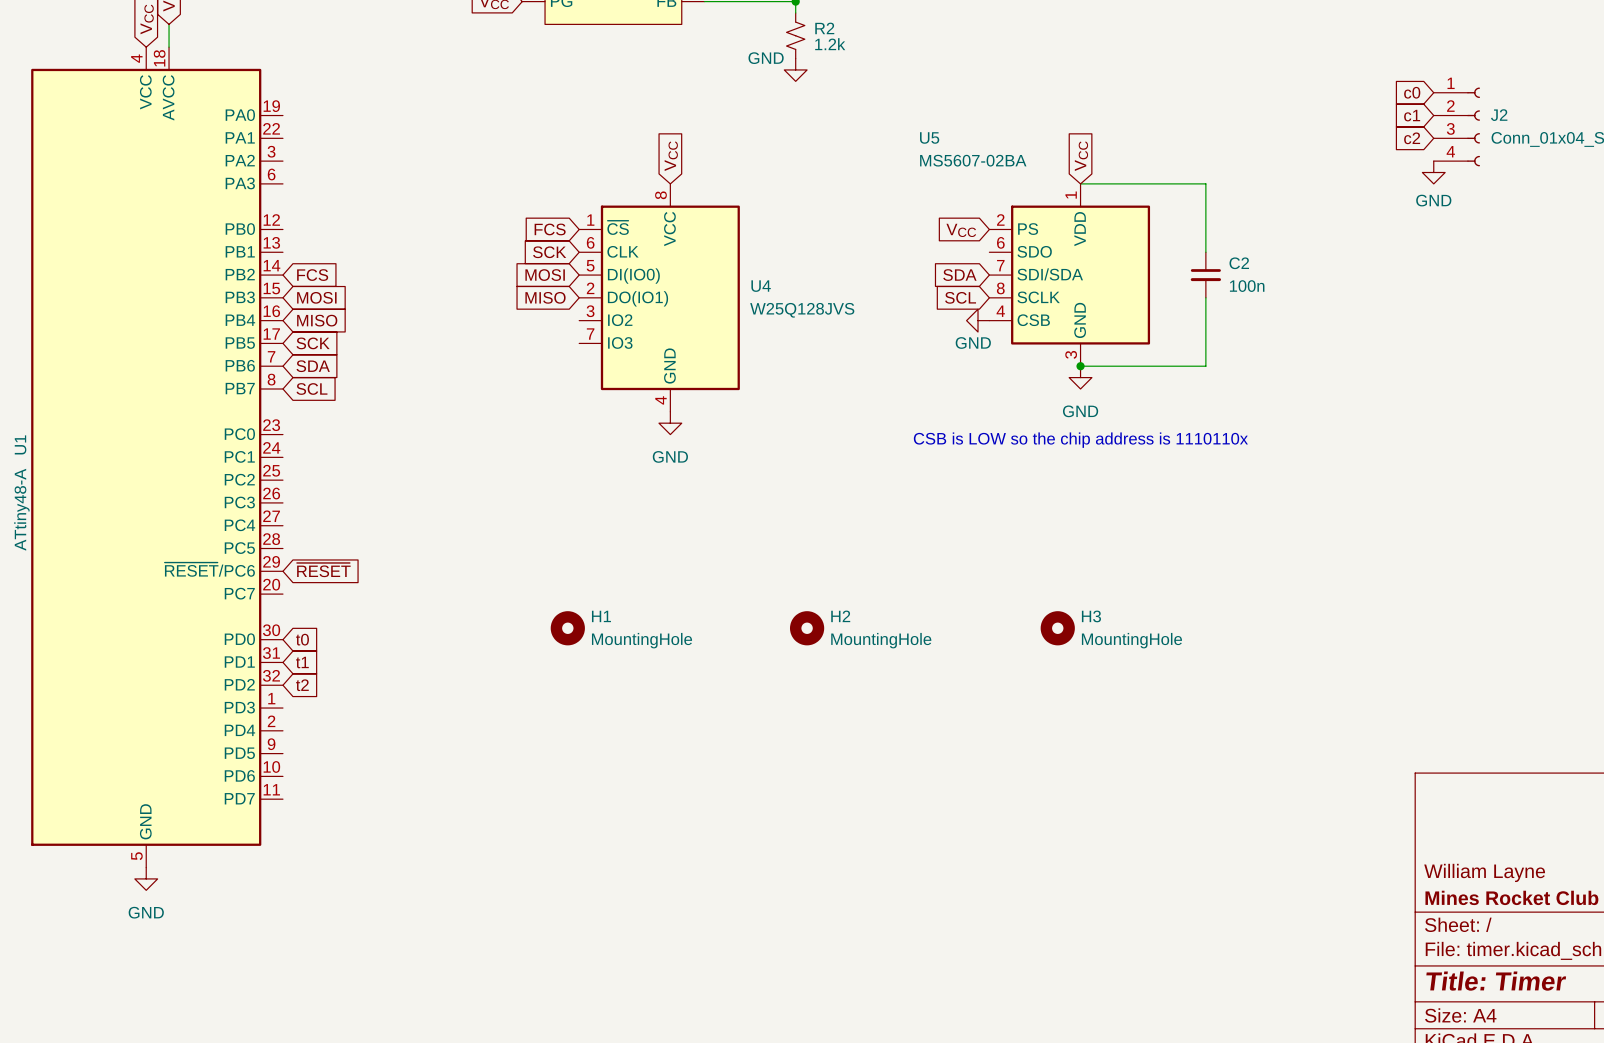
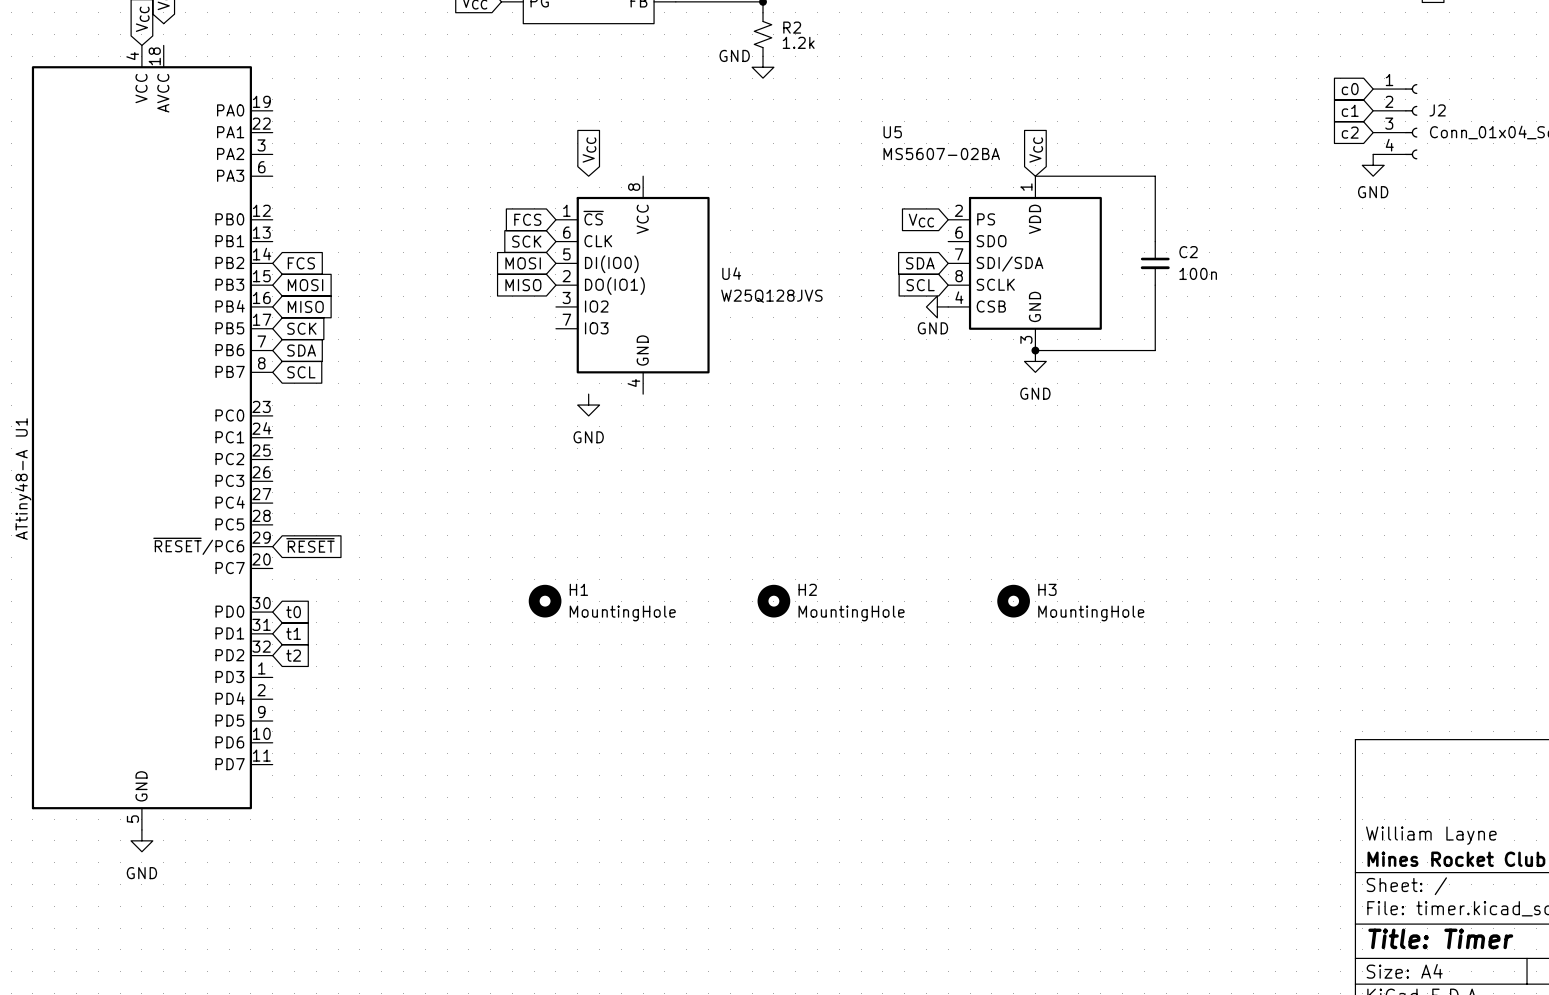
wire: (169, 24) (169, 47) -> none
global label position: VCC (671, 156) -> VCC (589, 150)
power symbol position: GND (670, 423) -> GND (588, 405)
text: CSB is LOW so the chip address is 1110110x (1080, 440) -> none

